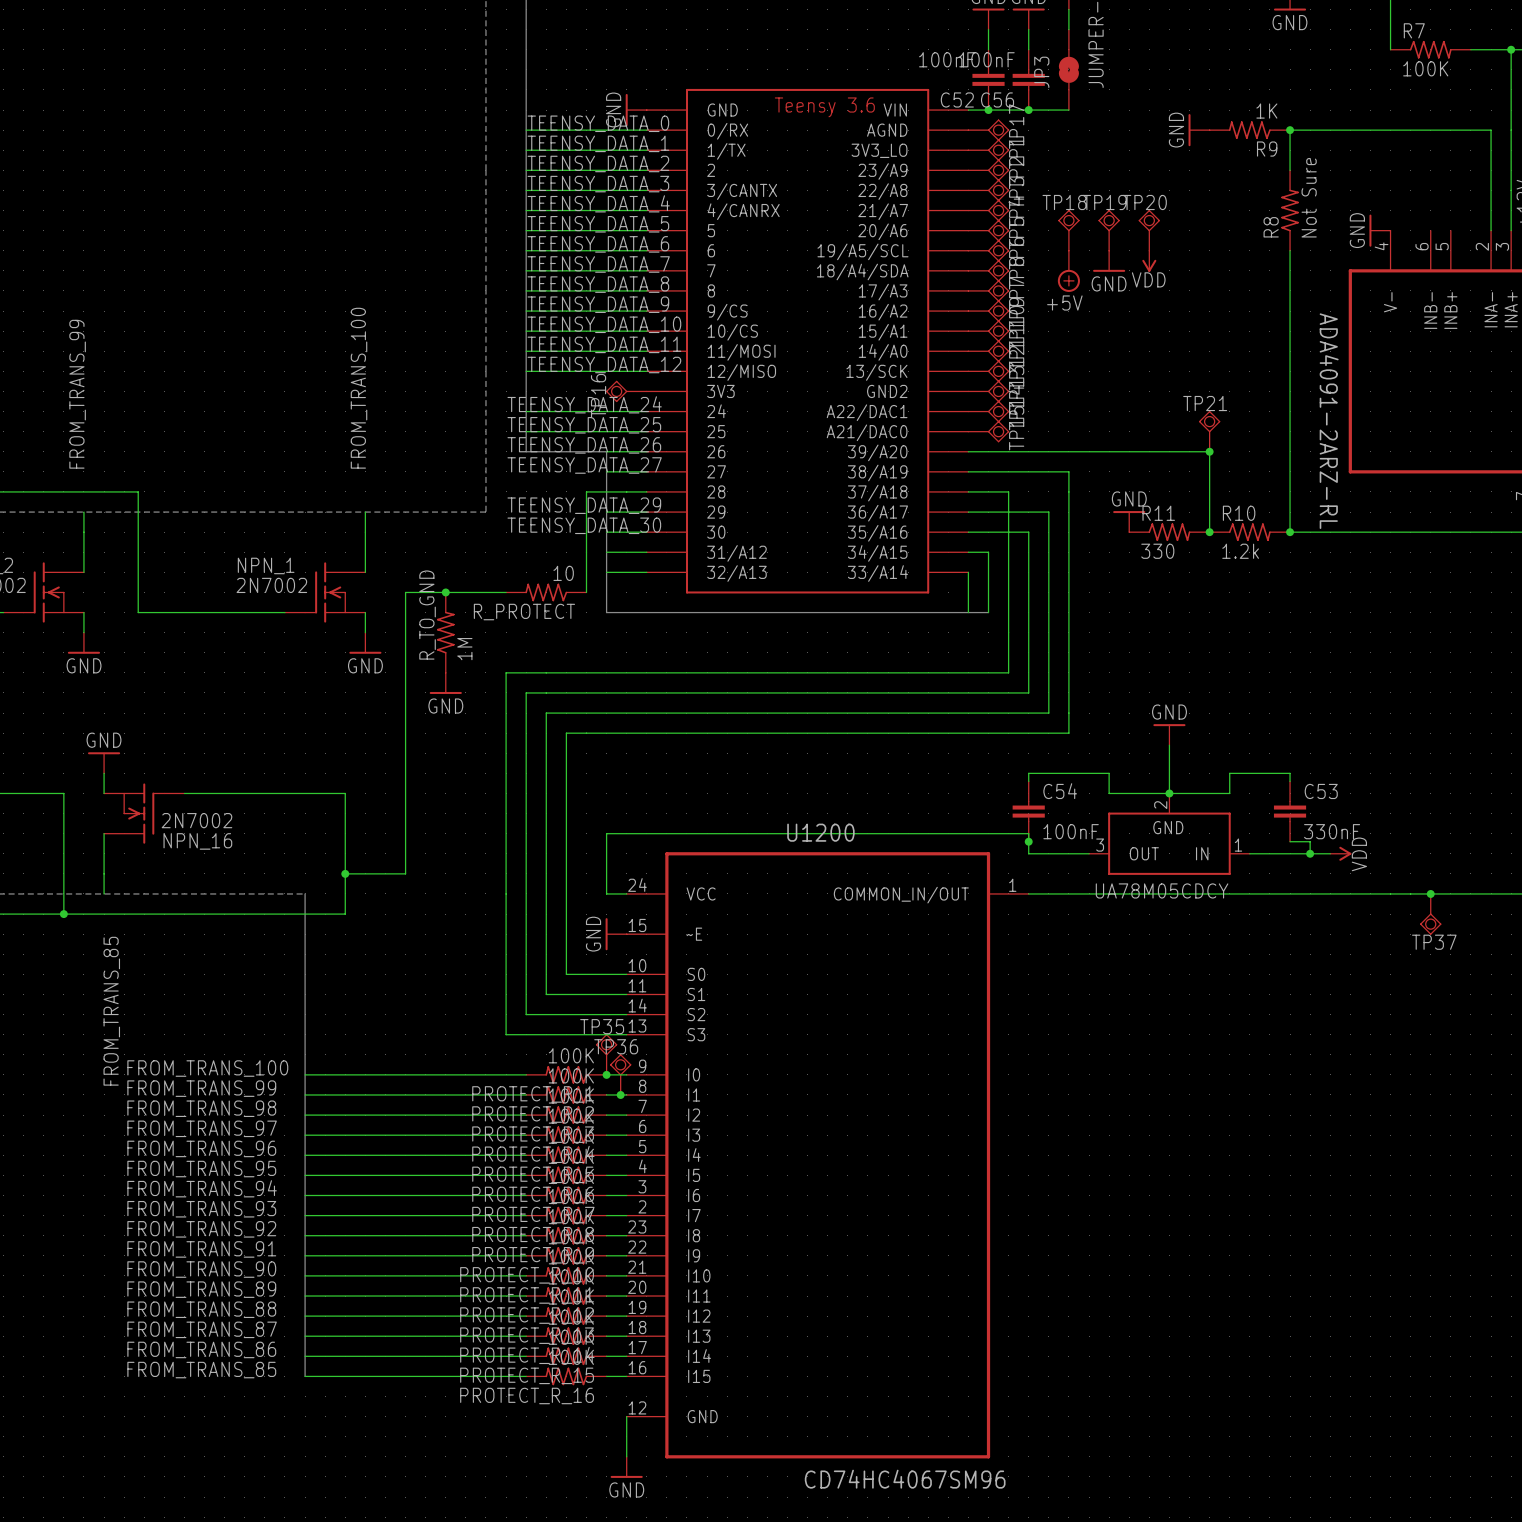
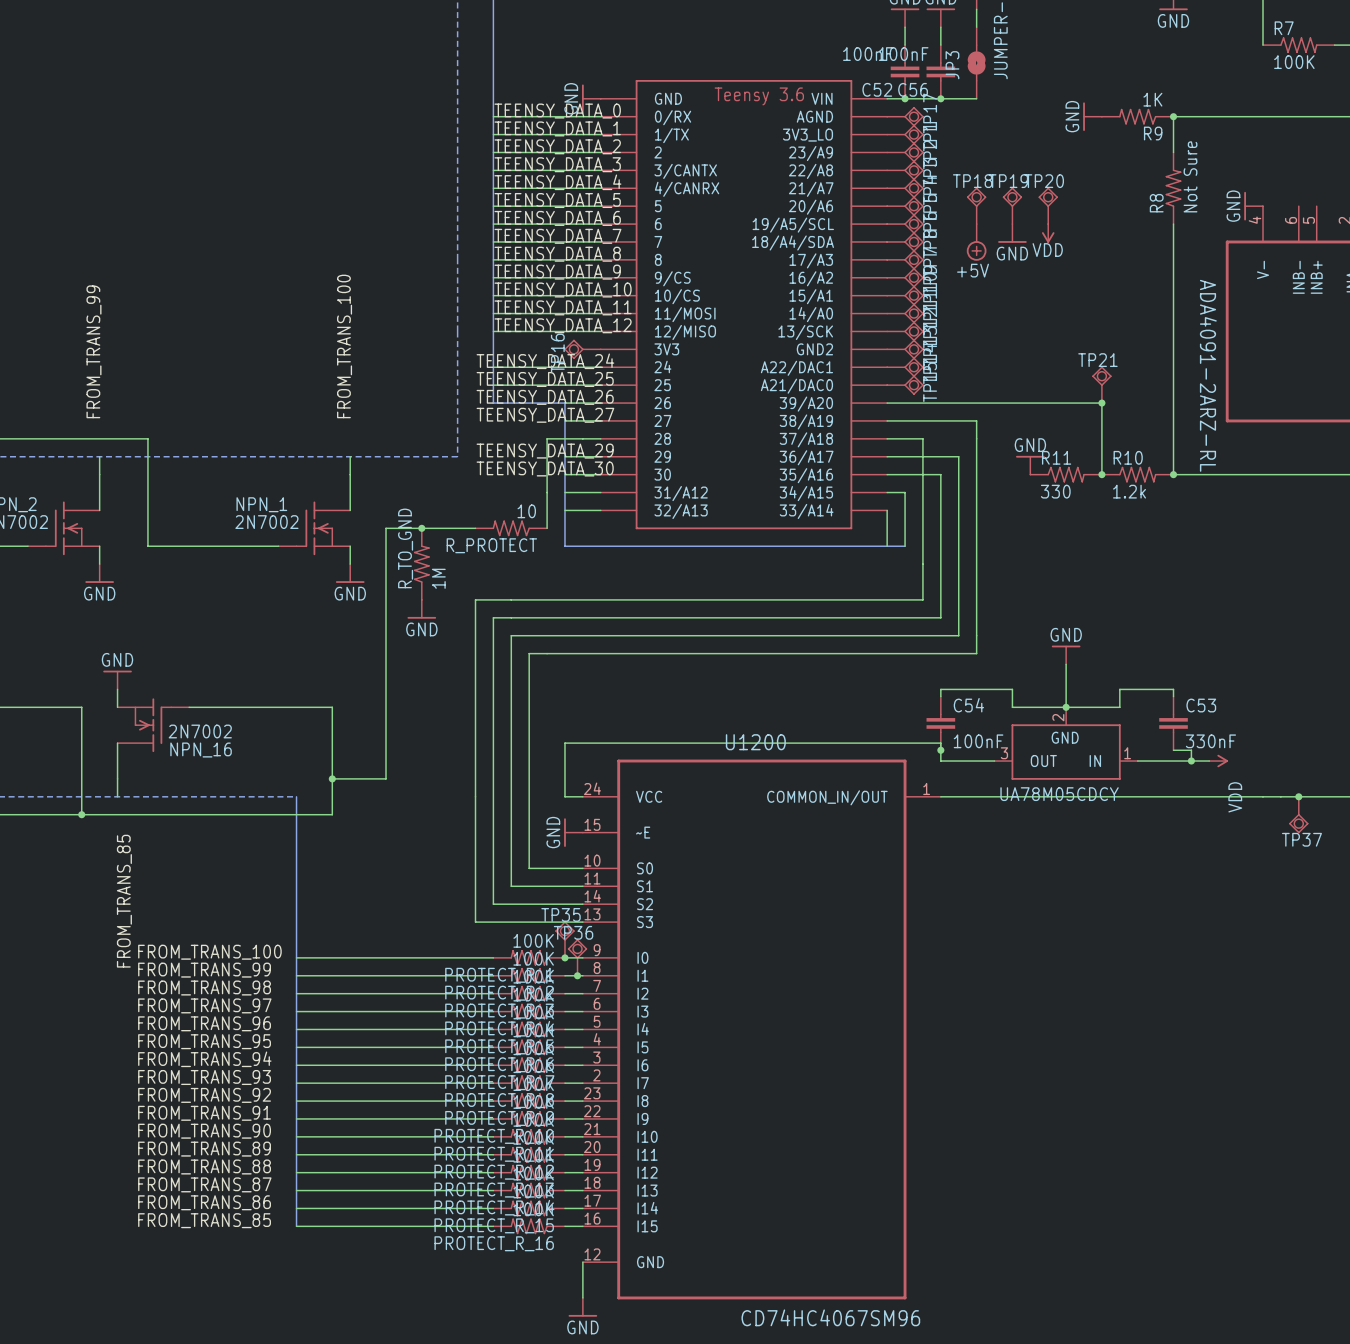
power symbol text position: VDD (1359, 854) -> VDD (1235, 797)

